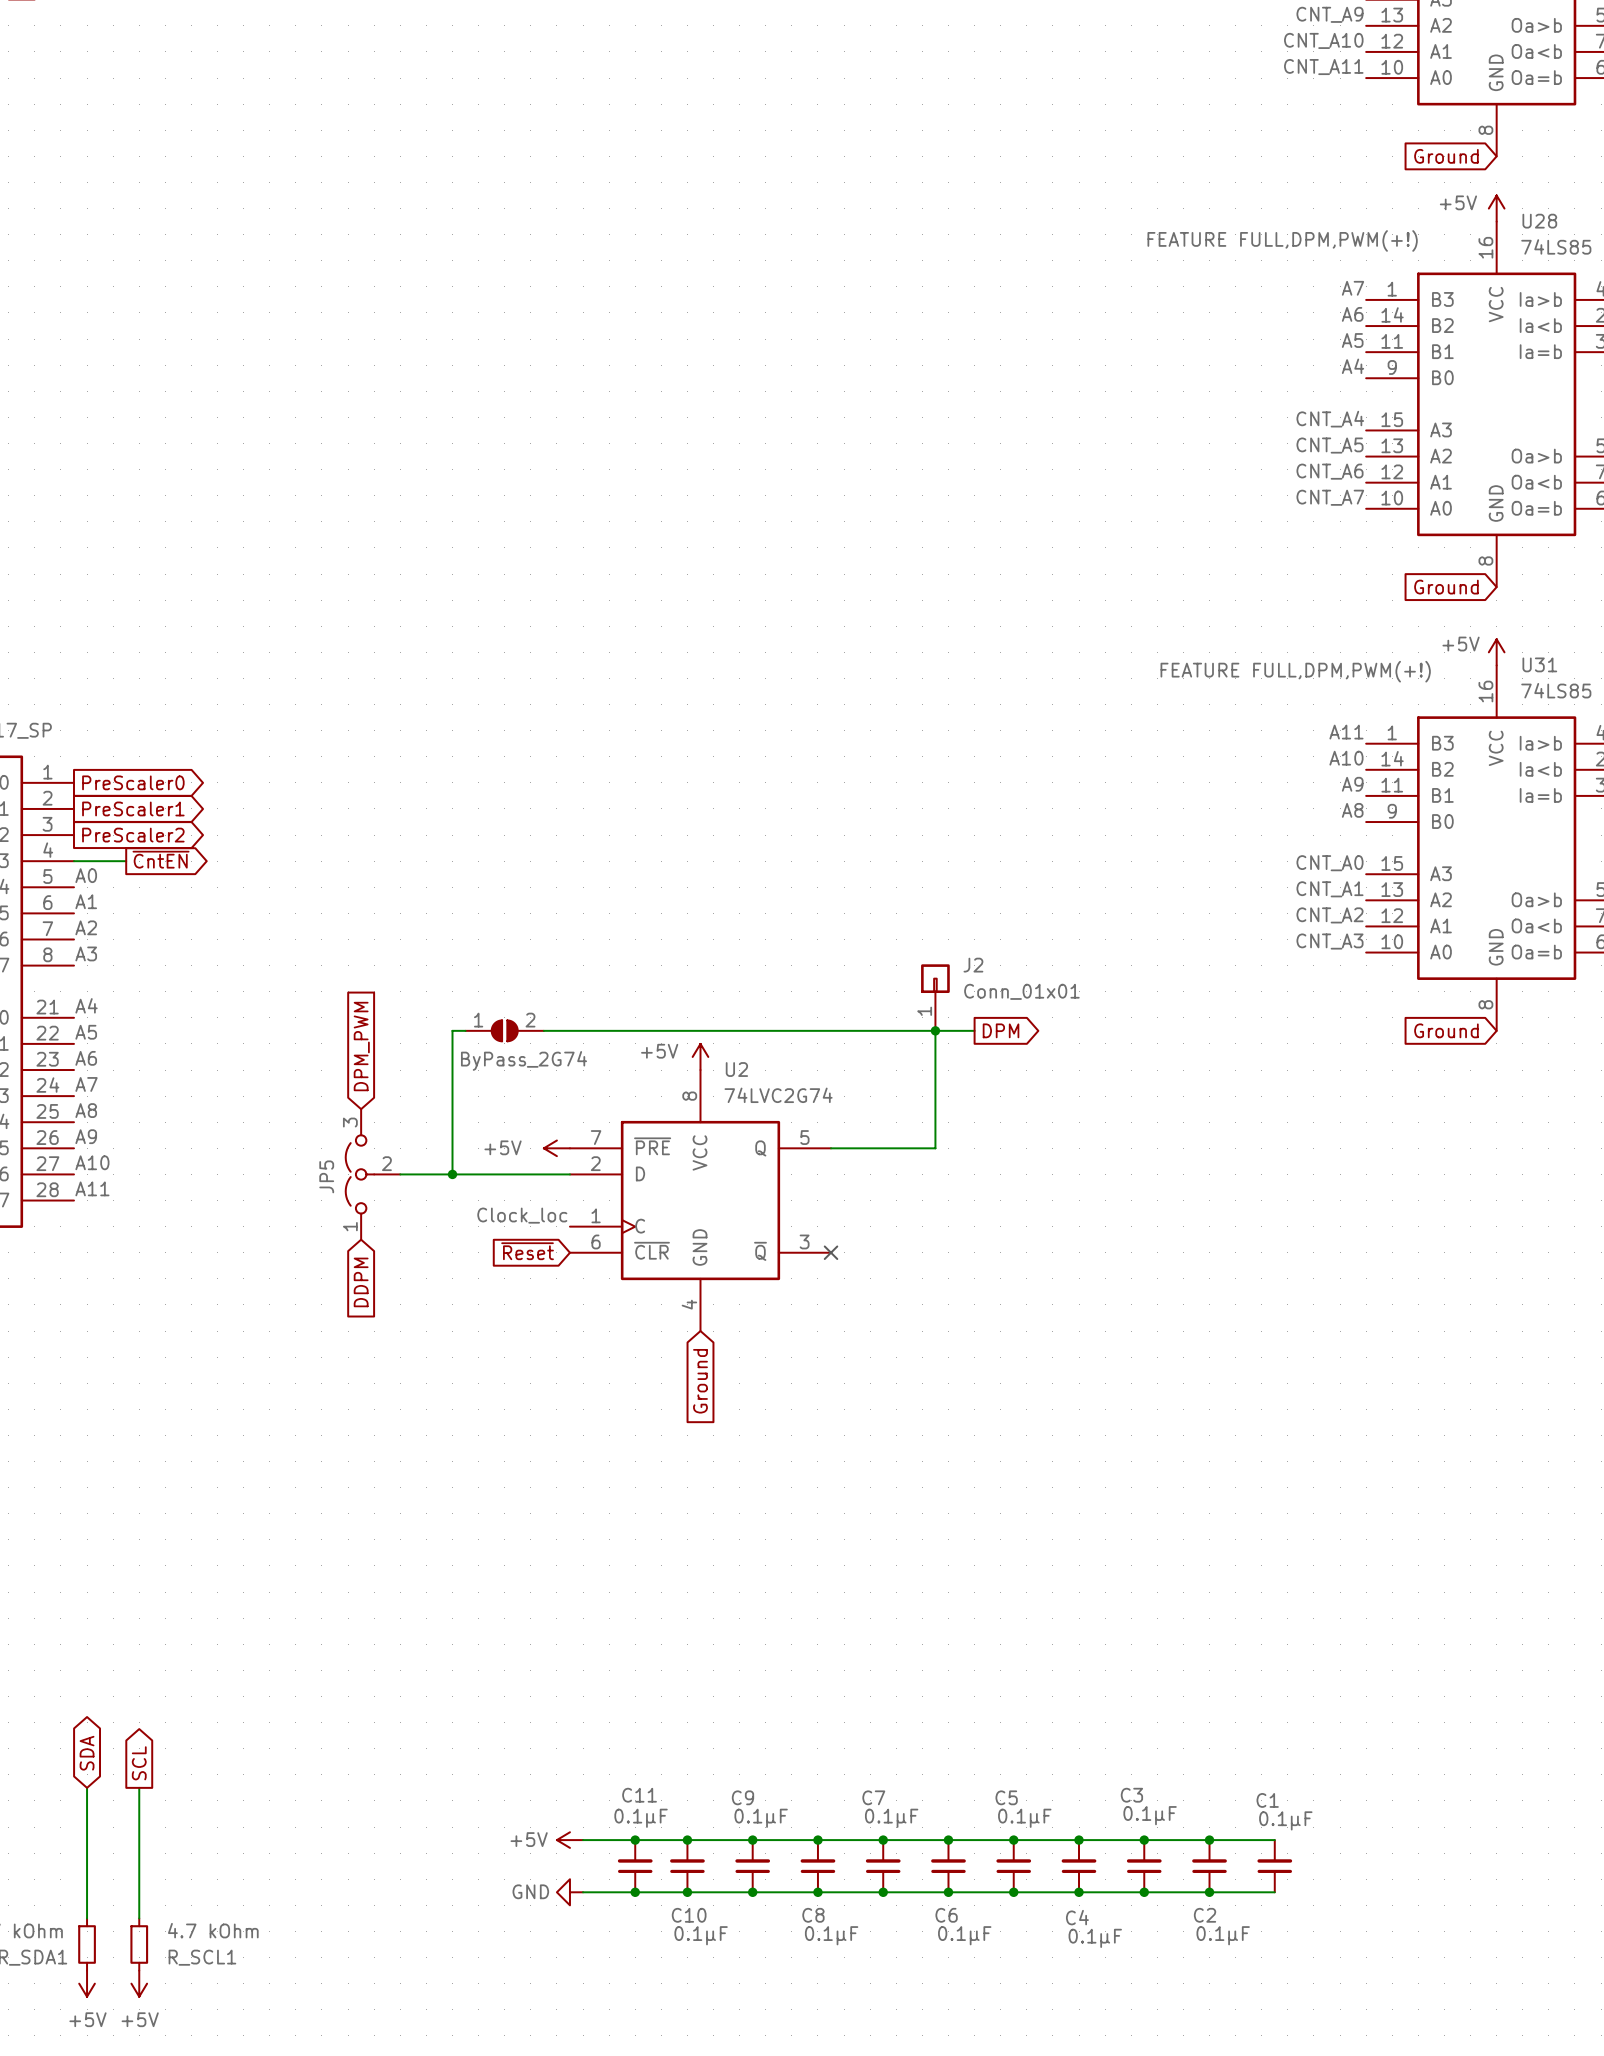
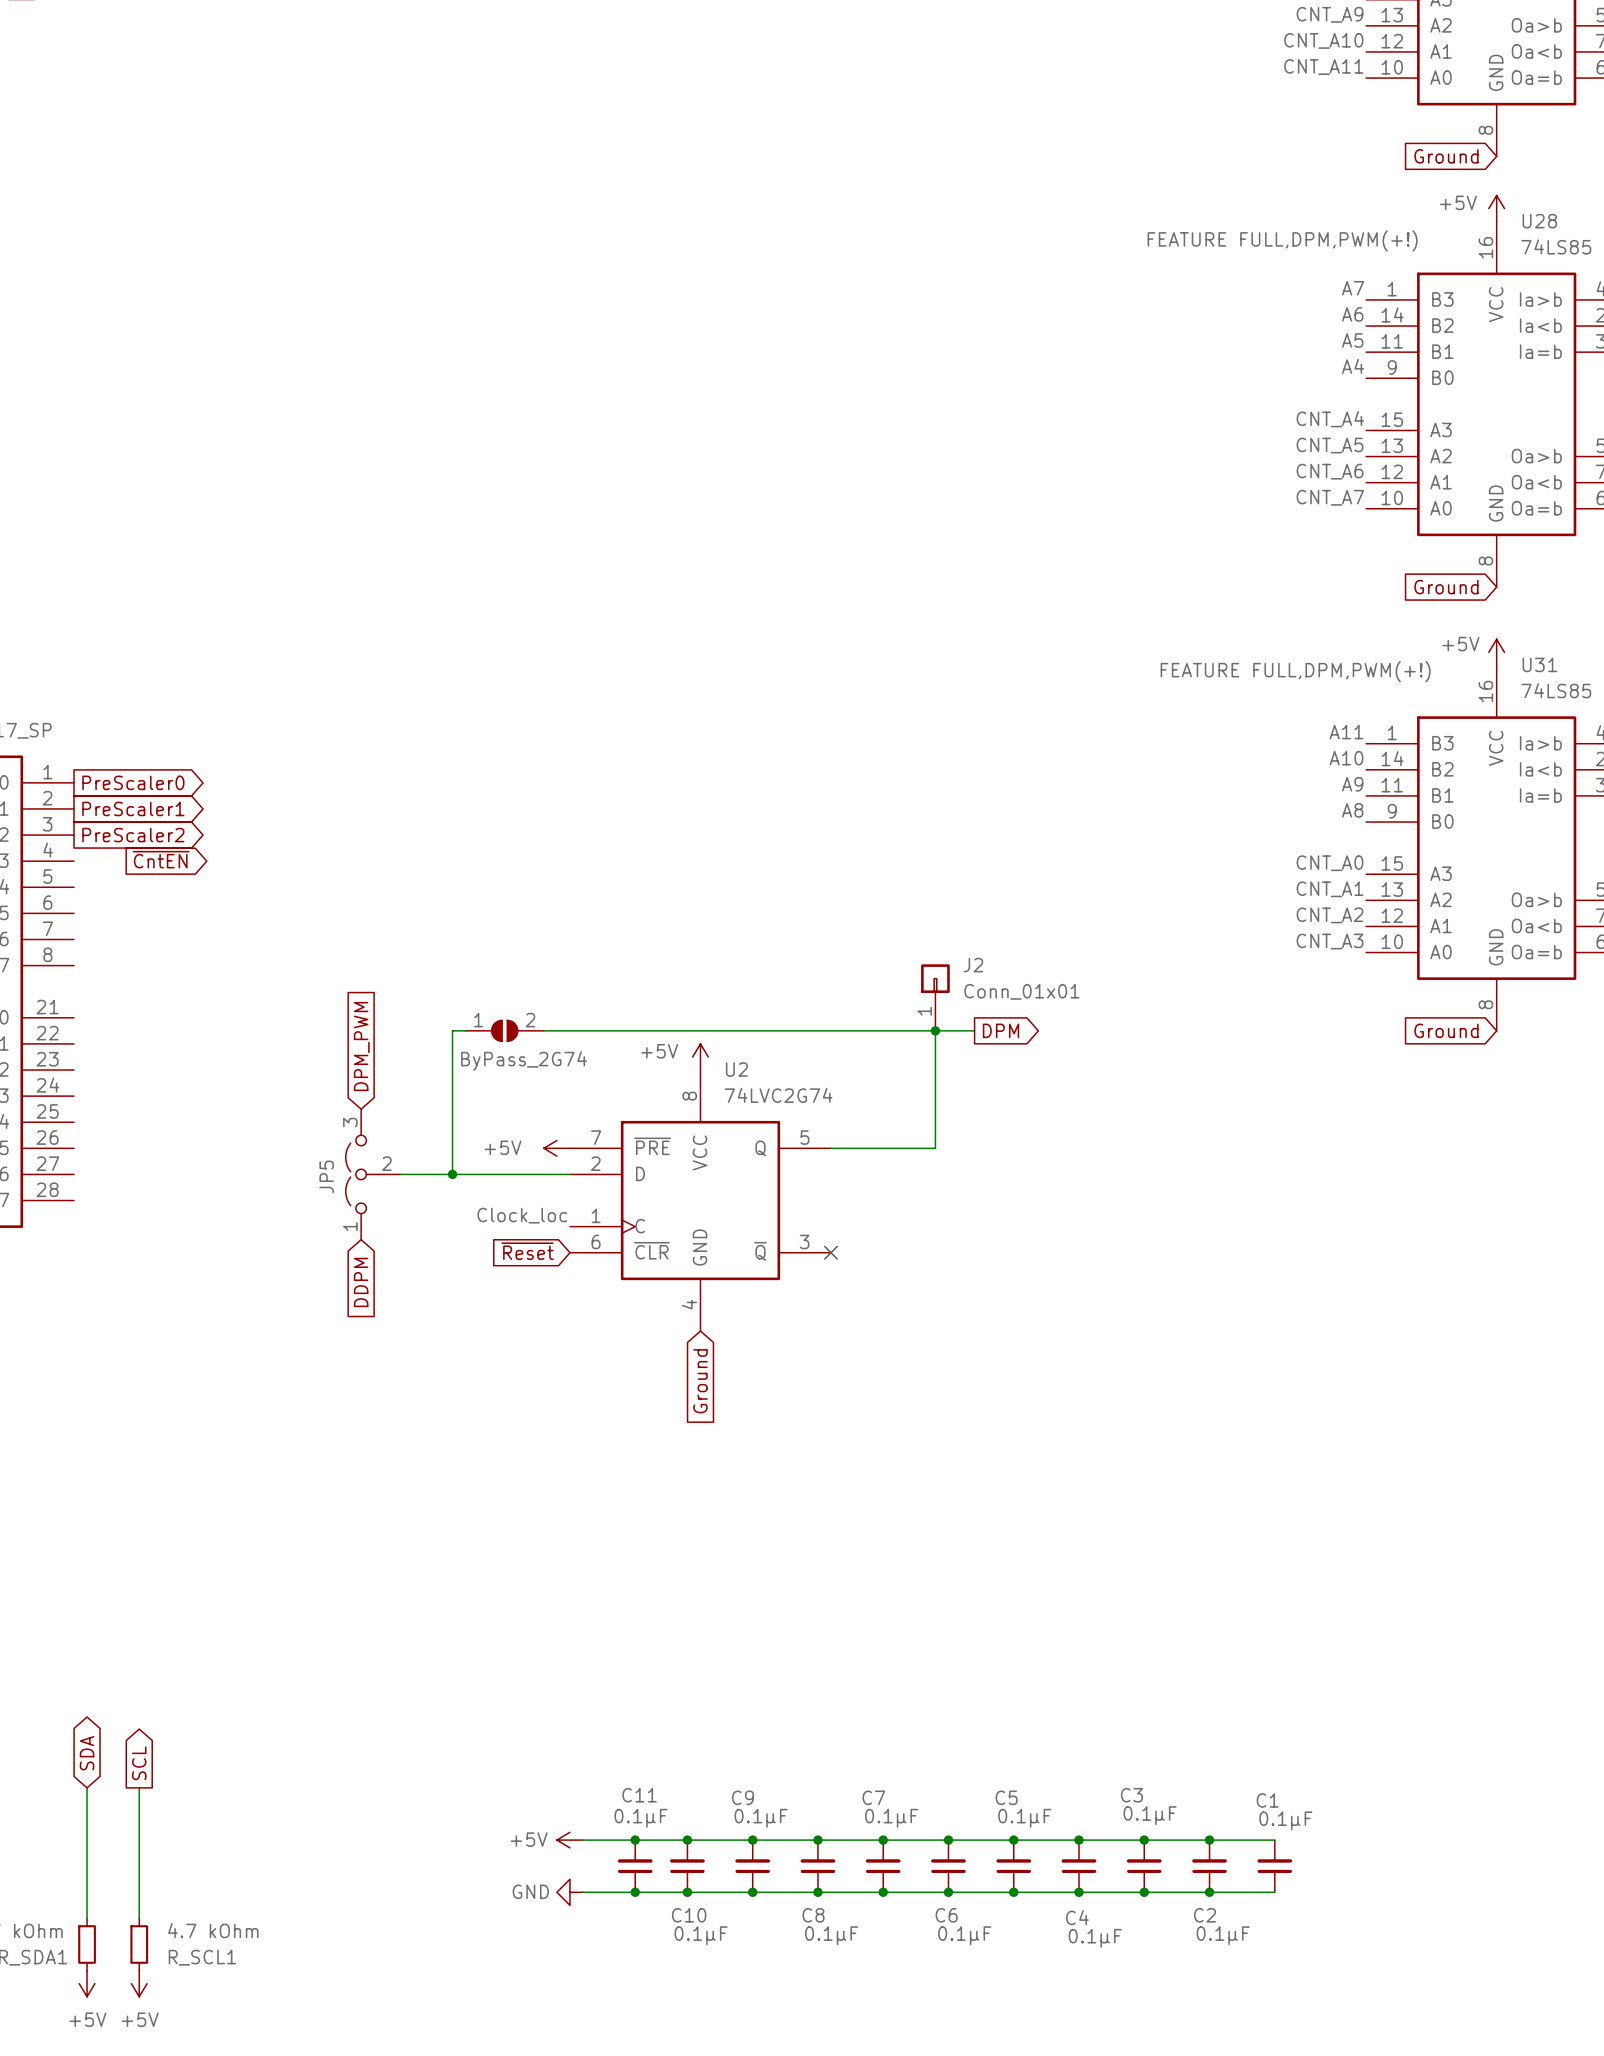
wire: (73, 861) (126, 861) -> none
label: A0 (86, 875) -> none
label: A1 (86, 901) -> none
label: A2 (86, 927) -> none
label: A3 (86, 953) -> none
label: A4 (86, 1005) -> none
label: A5 (86, 1032) -> none
label: A6 (86, 1058) -> none
label: A7 (86, 1084) -> none
label: A8 (86, 1110) -> none
label: A9 (86, 1136) -> none
label: A10 (92, 1162) -> none
label: A11 (92, 1188) -> none

